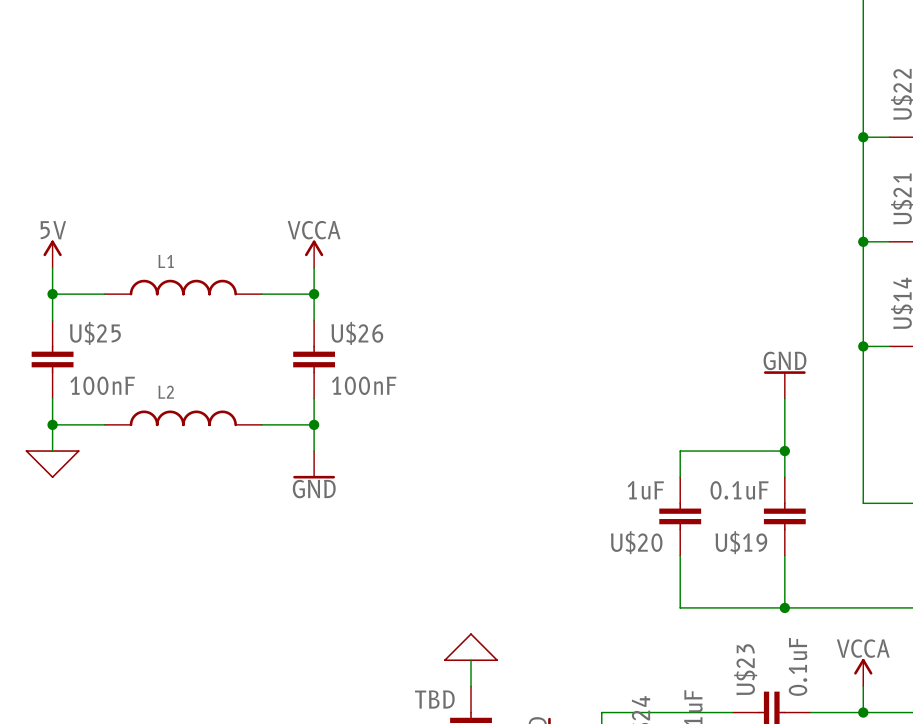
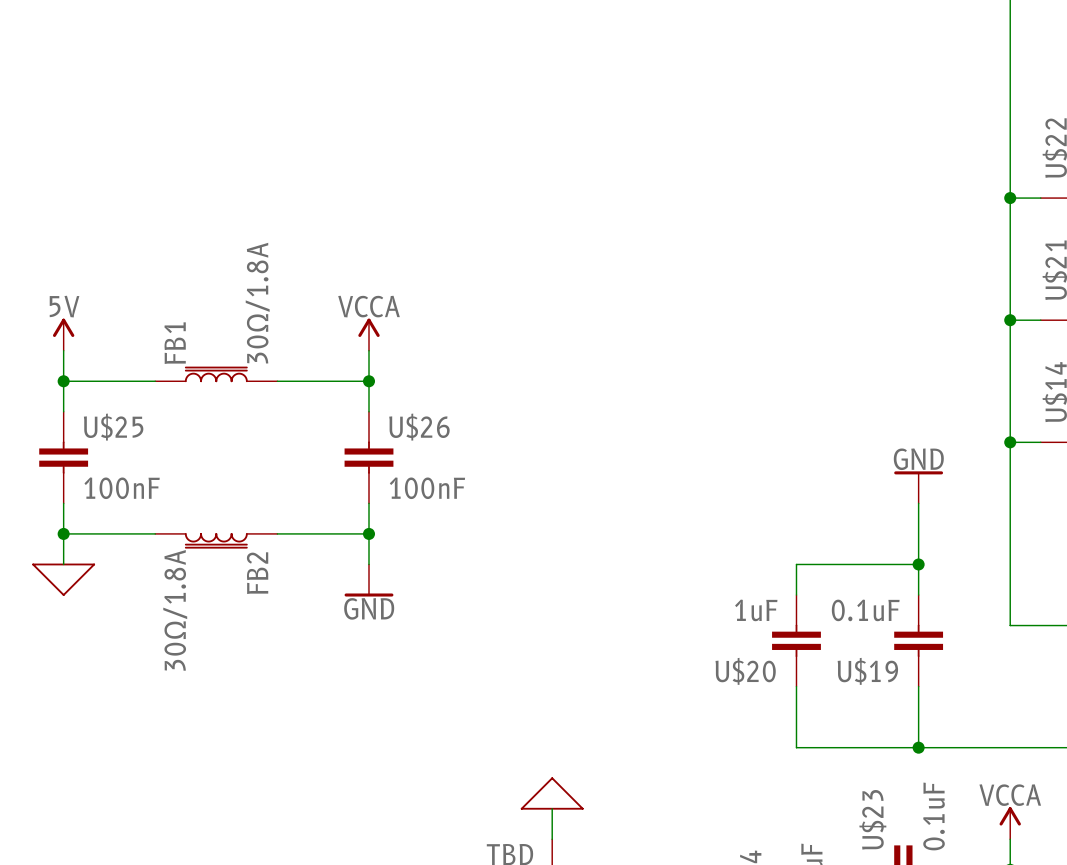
L1: (183, 287) -> none
FB1: none -> 30Ω/1.8A (216, 374)
L2: (183, 418) -> none
FB2: none -> 30Ω/1.8A (216, 540)

